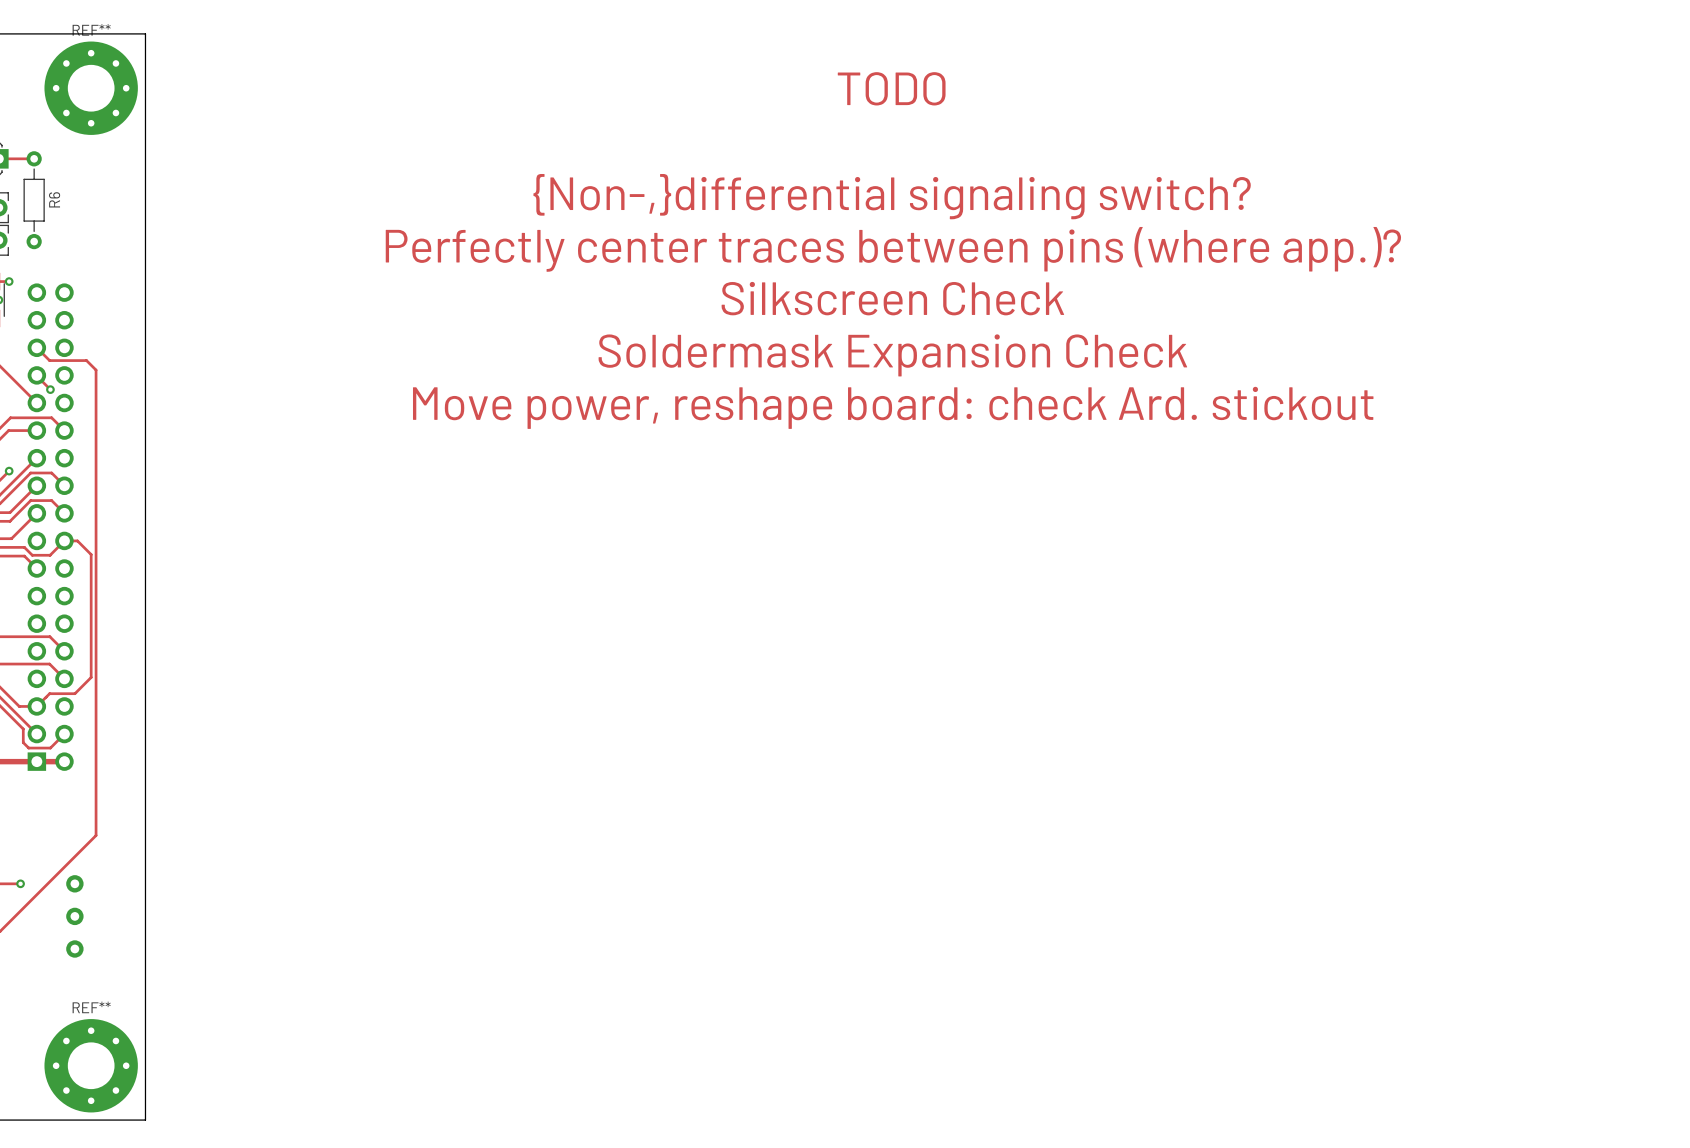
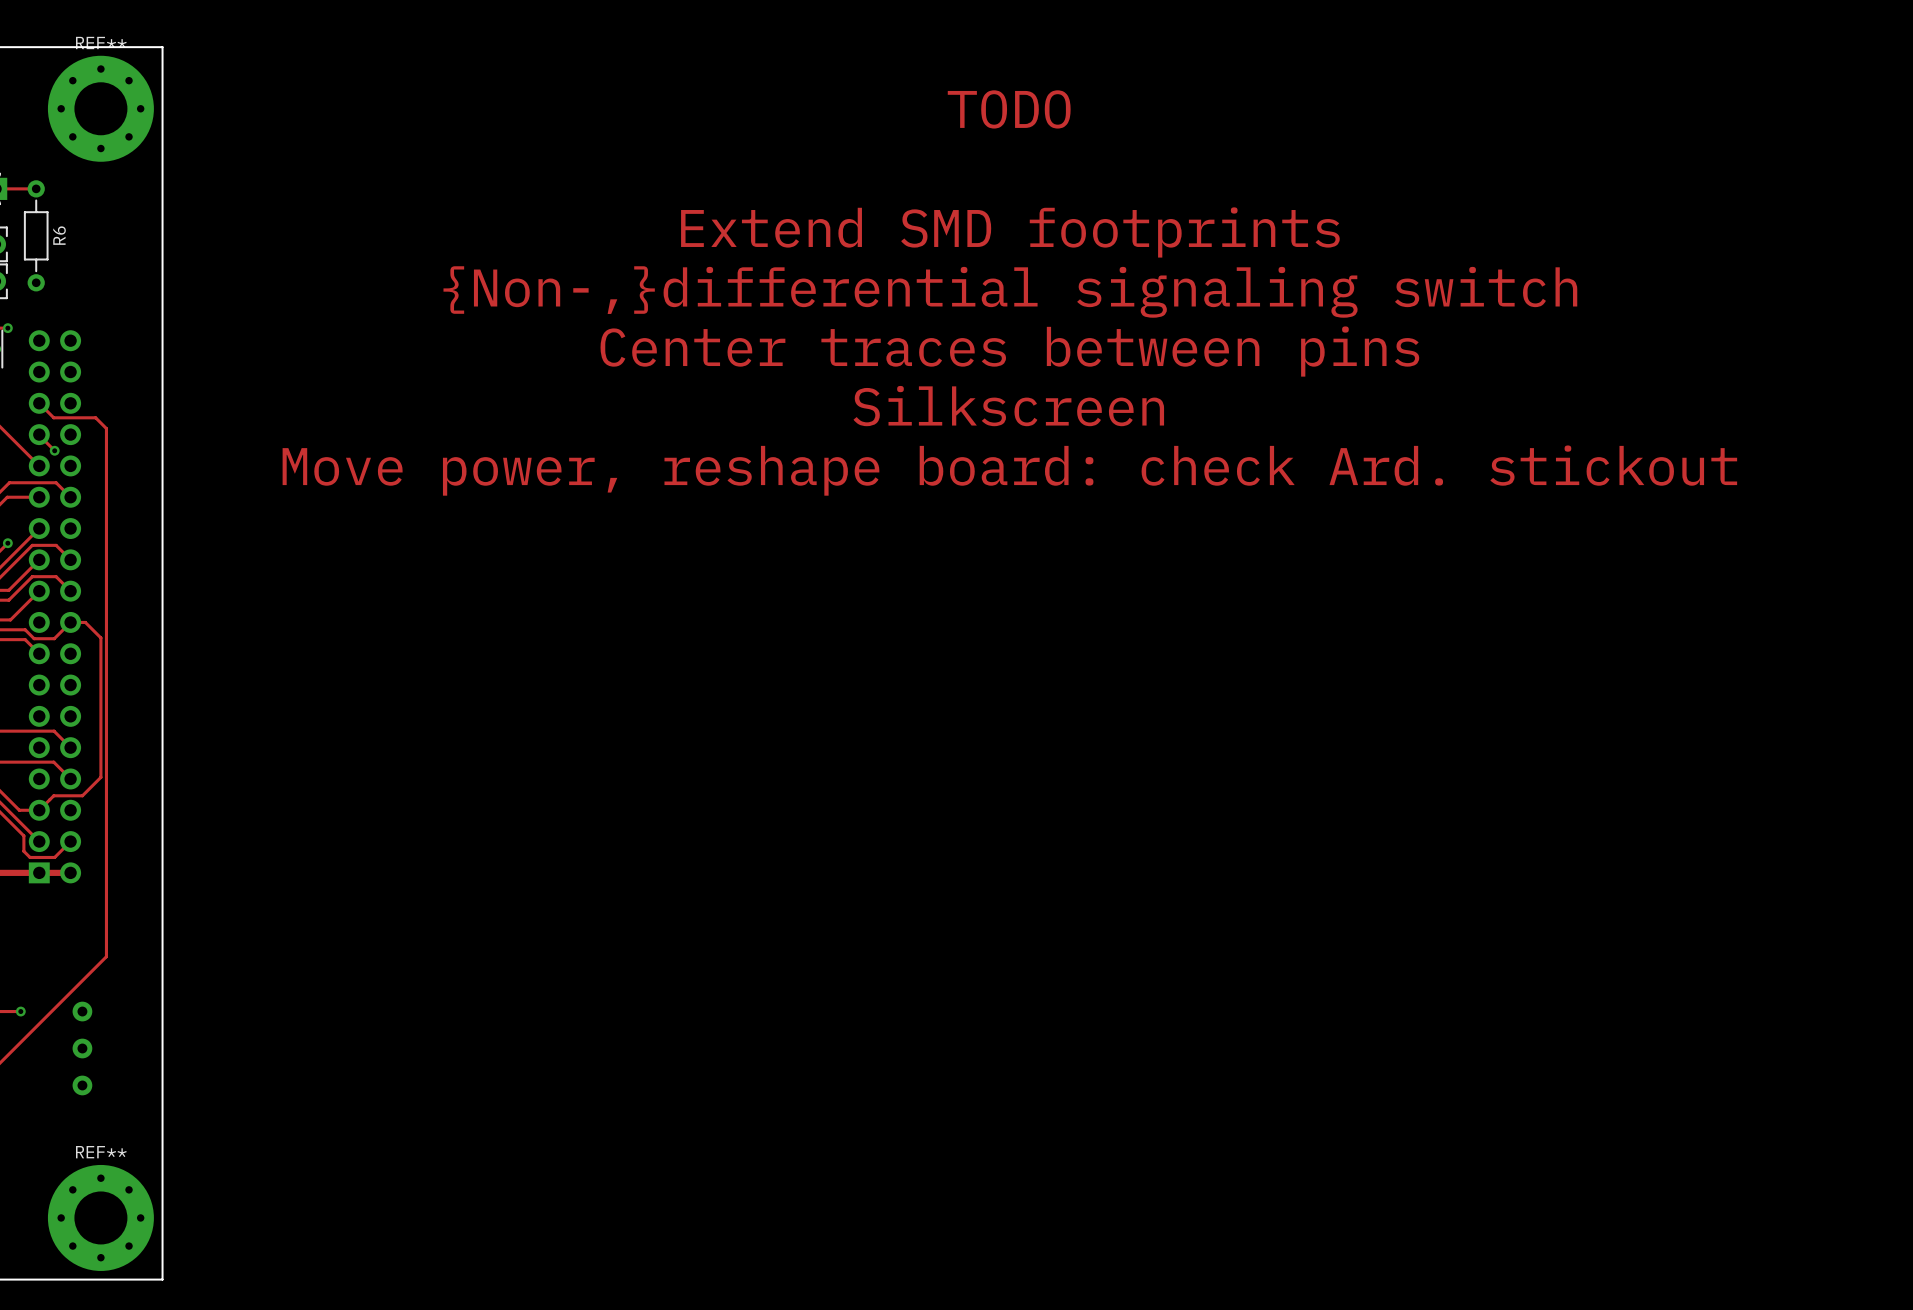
text: {Non-,}differential signaling switch? (892, 196) -> Extend SMD footprints (1010, 232)
text: Perfectly center traces between pins (where app.)? (893, 249) -> {Non-,}differential signaling switch (1010, 291)
text: Silkscreen Check (892, 298) -> Center traces between pins (1009, 351)
text: Soldermask Expansion Check (892, 355) -> Silkscreen (1008, 406)

